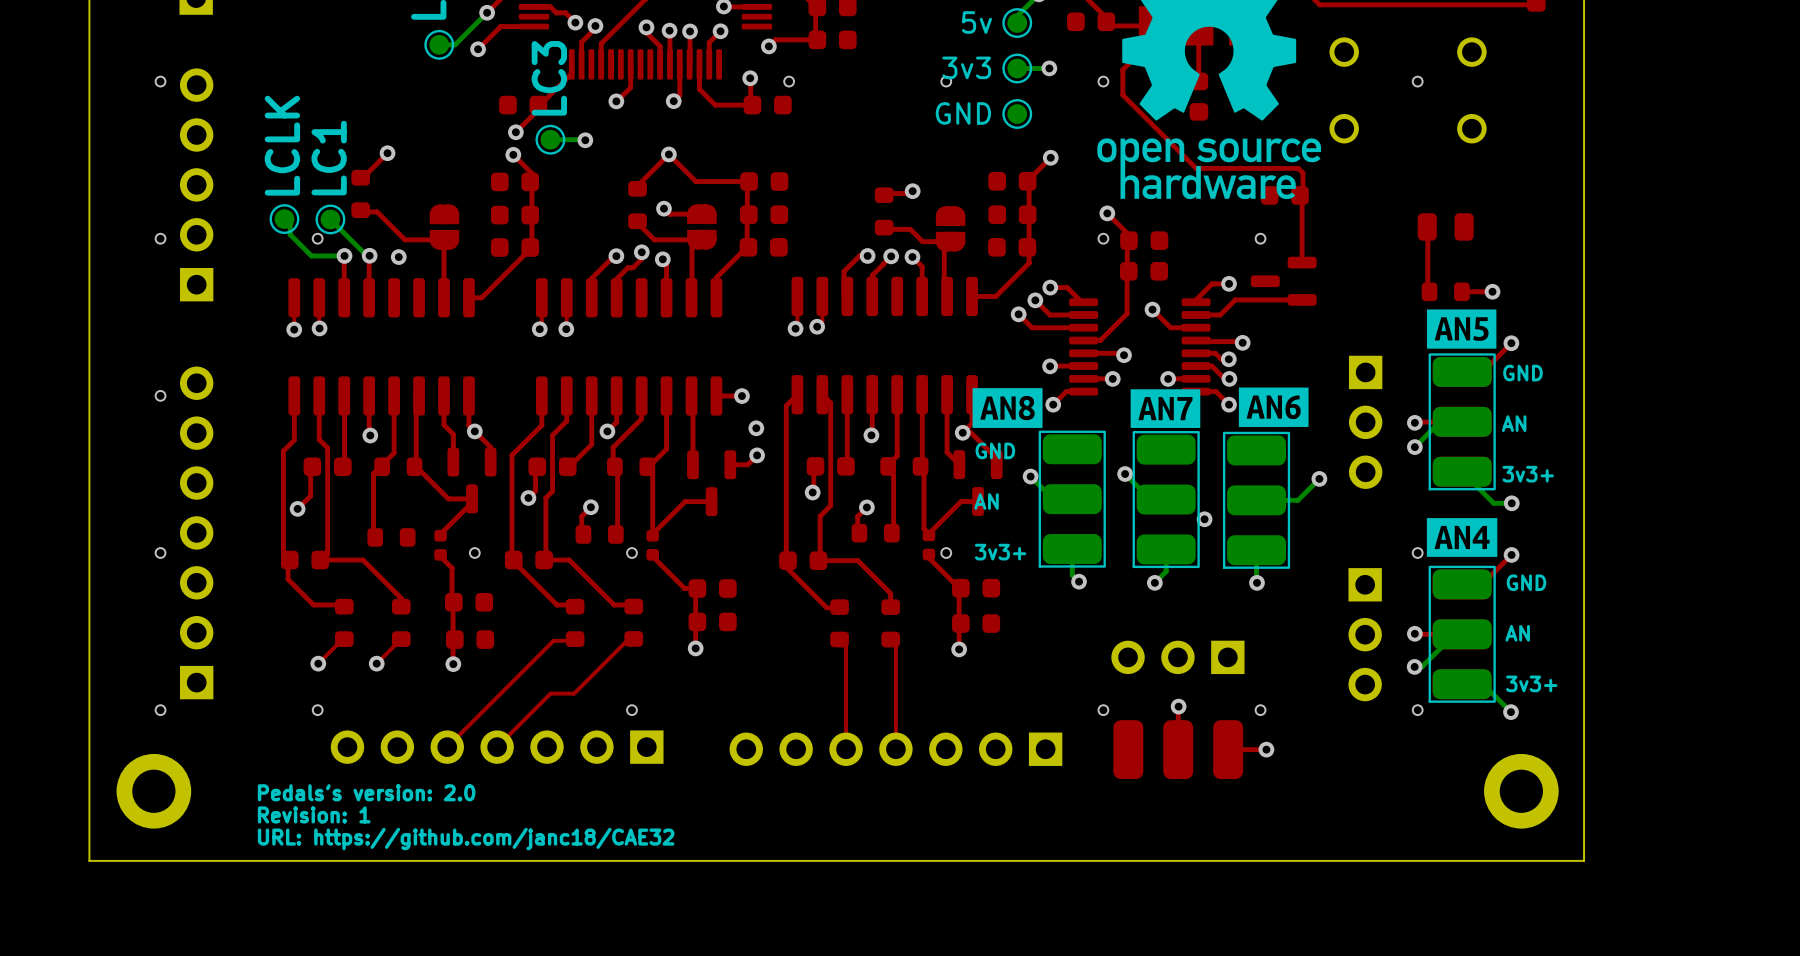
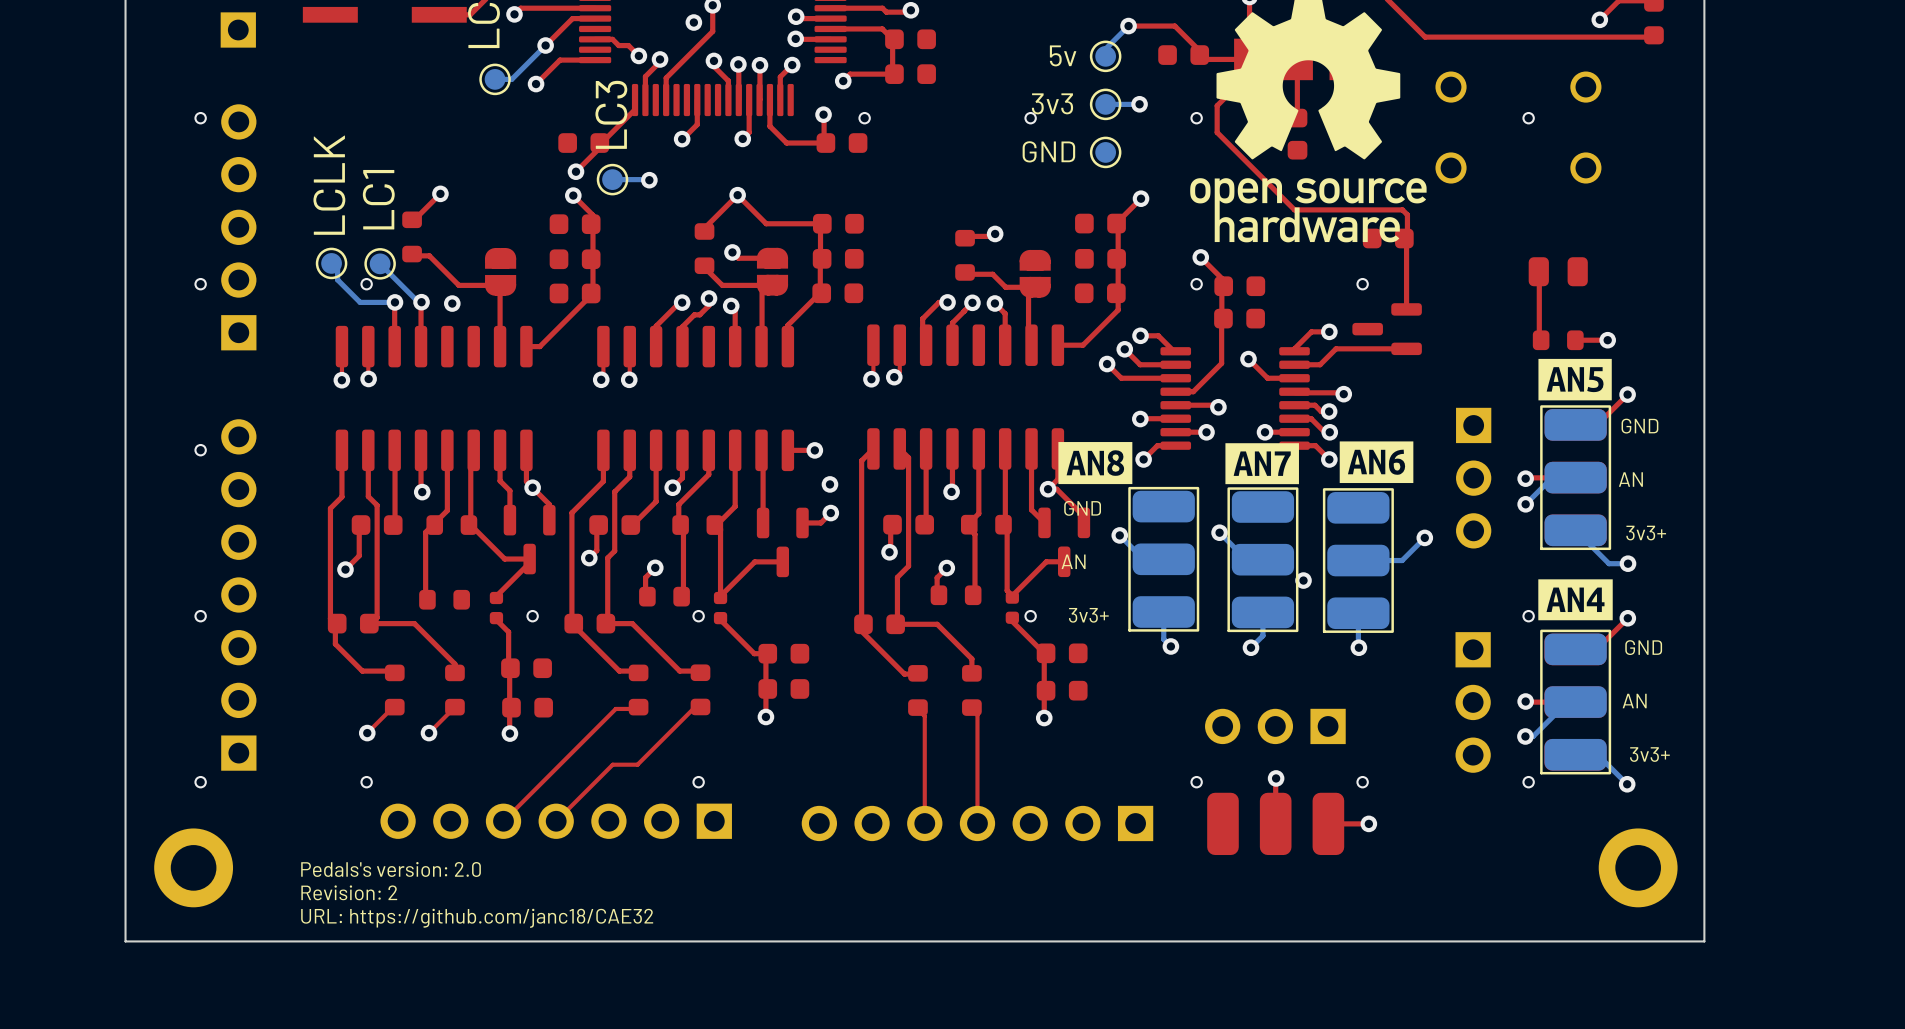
text: Revision: 1 (314, 814) -> Revision: 2 (349, 892)

